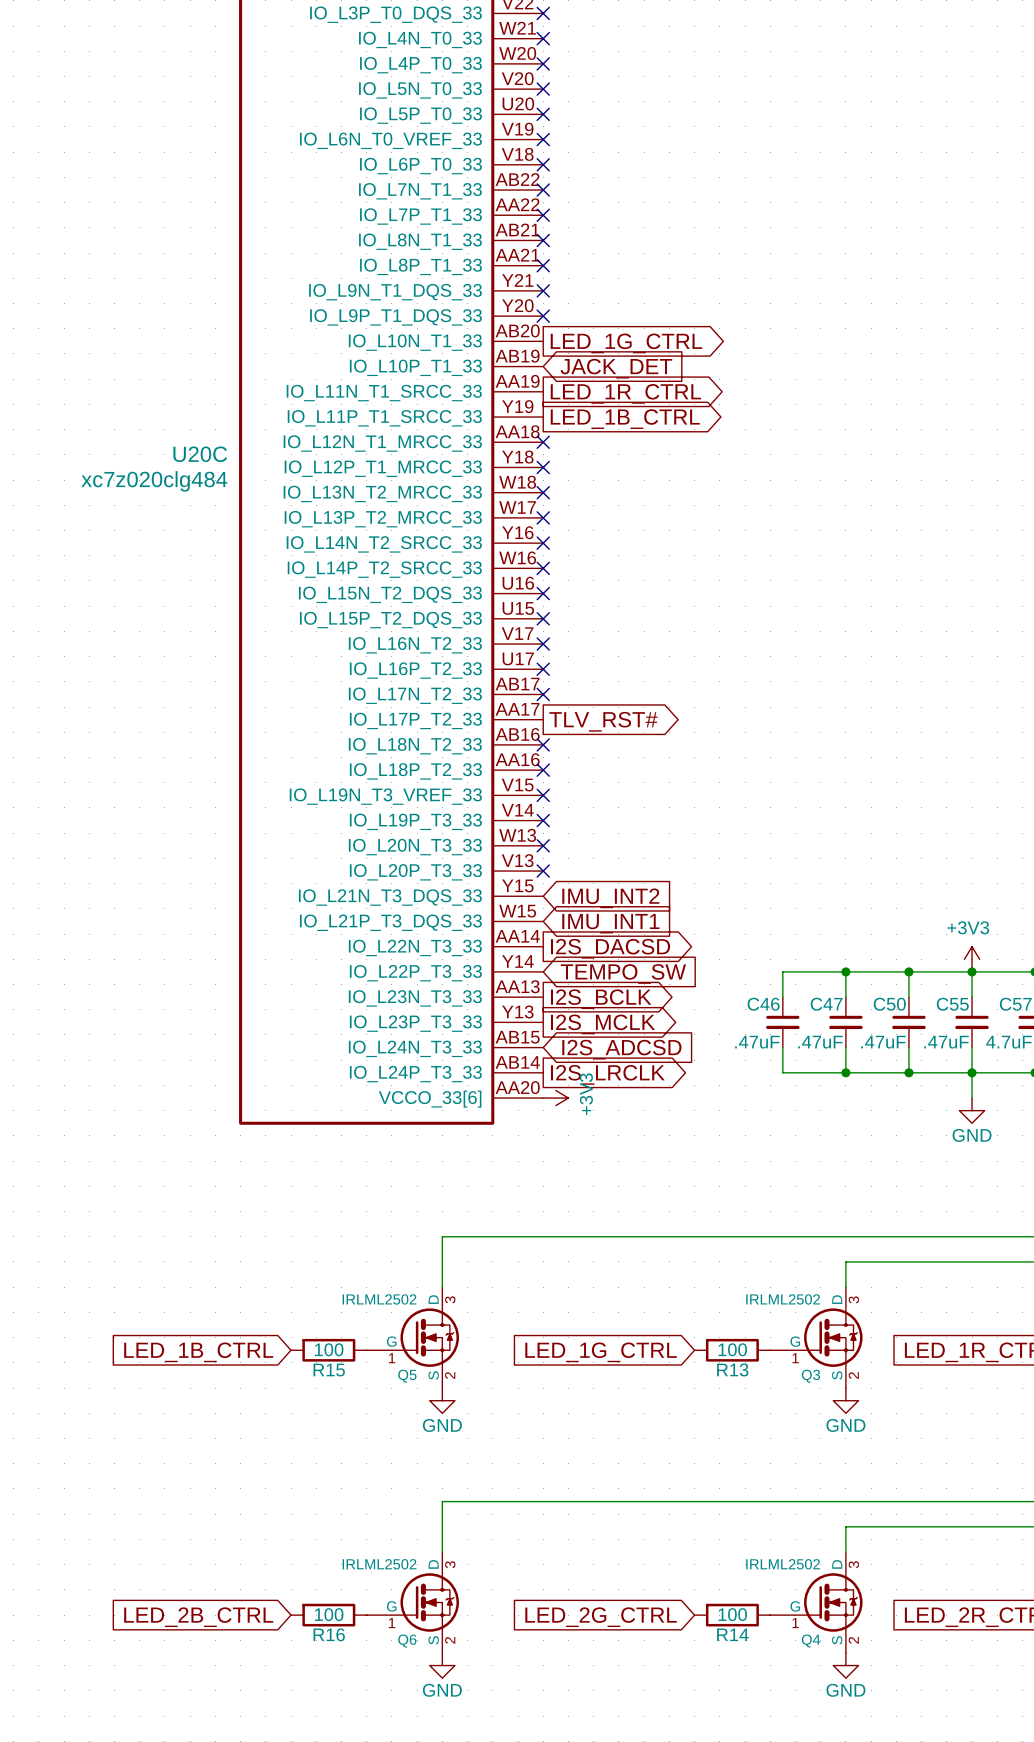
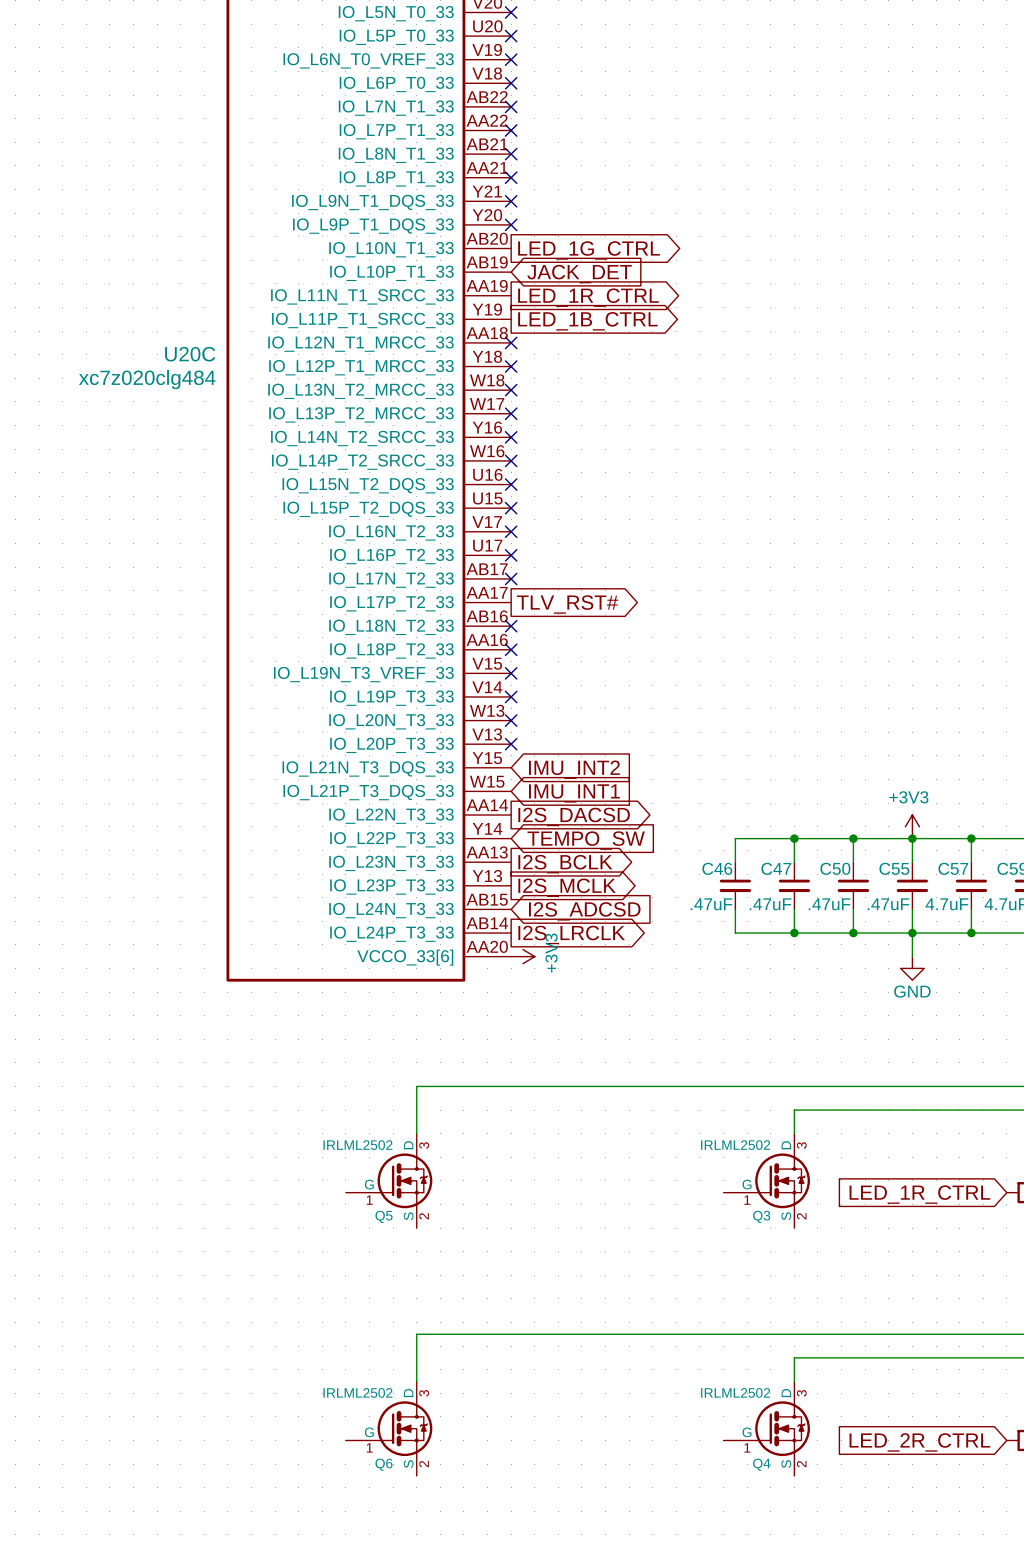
R15: 100 (328, 1350) -> none
R13: 100 (732, 1350) -> none
global label: LED_1B_CTRL (198, 1352) -> none
global label: LED_1G_CTRL (601, 1352) -> none
power symbol: GND (442, 1400) -> none
power symbol: GND (845, 1400) -> none
R16: 100 (328, 1615) -> none
R14: 100 (732, 1615) -> none
global label: LED_2B_CTRL (198, 1617) -> none
global label: LED_2G_CTRL (601, 1617) -> none
power symbol: GND (442, 1665) -> none
power symbol: GND (845, 1665) -> none

